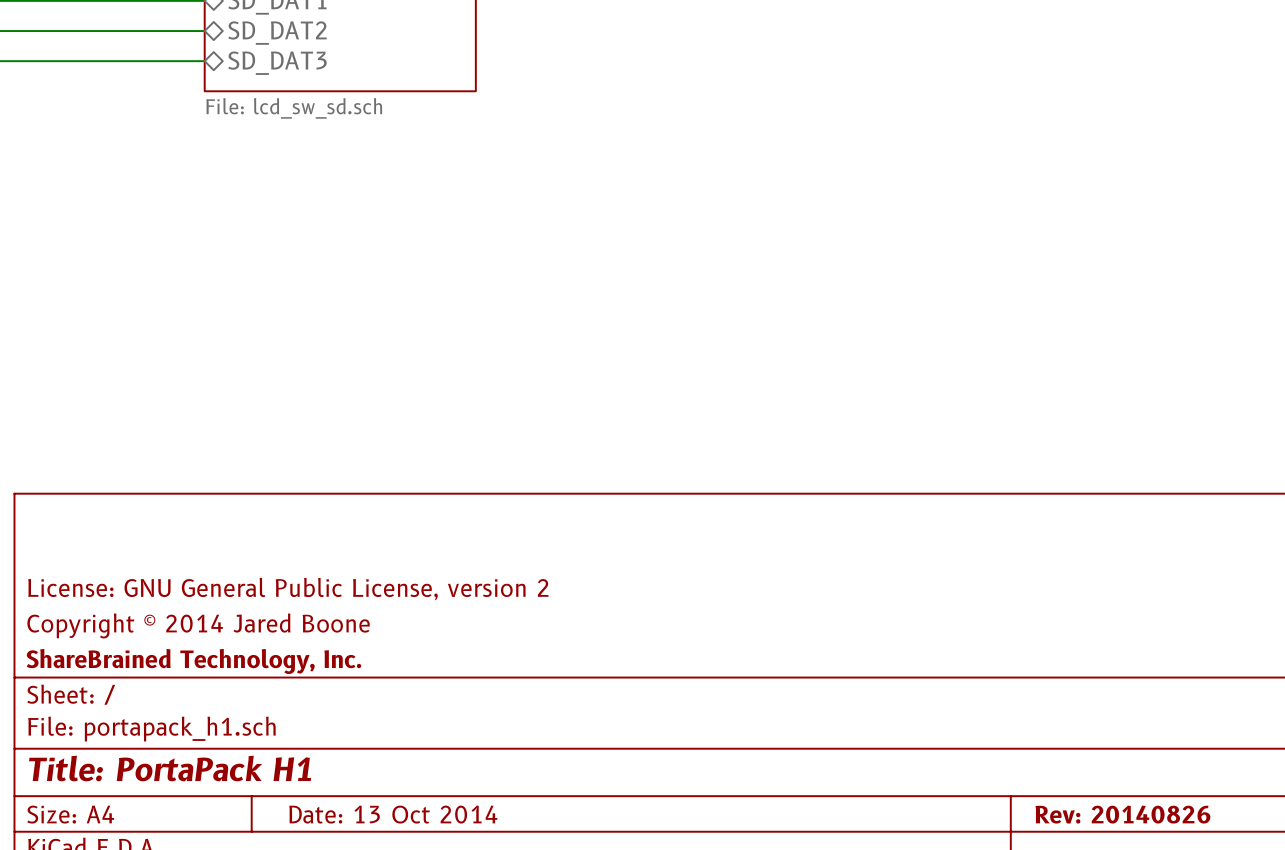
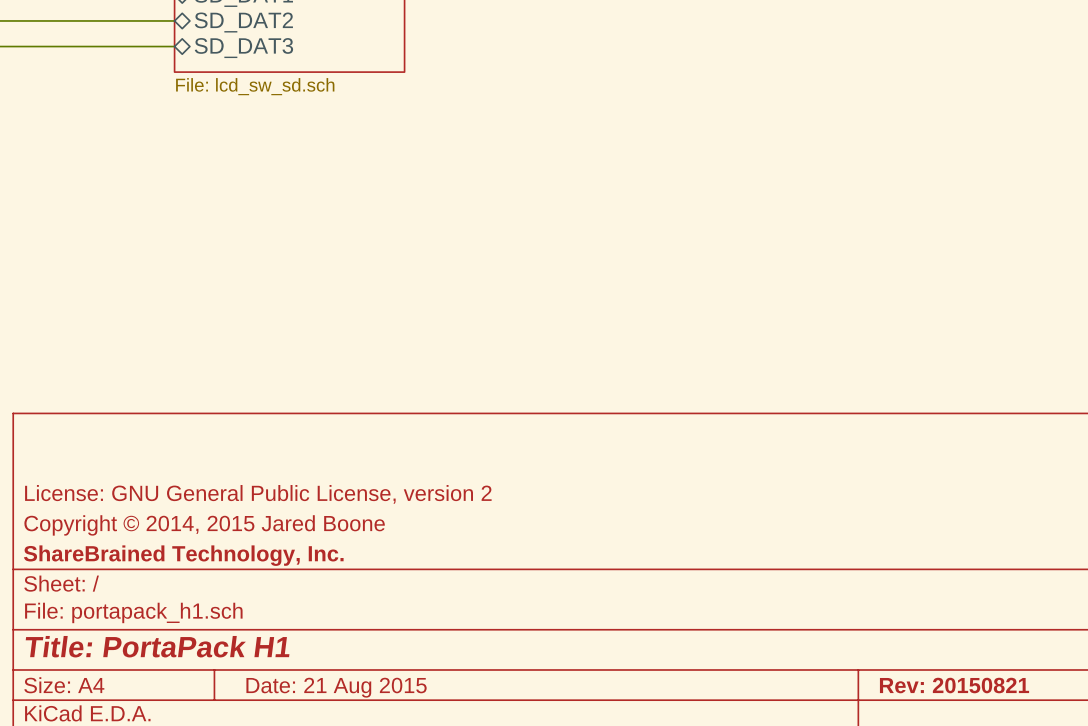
title block: Copyright © 2014 Jared Boone (198, 625) -> Copyright © 2014, 2015 Jared Boone (204, 525)
title block: Date: 13 Oct 2014 (393, 814) -> Date: 21 Aug 2015 (336, 687)
title block: Rev: 20140826 (1122, 814) -> Rev: 20150821 (954, 685)

